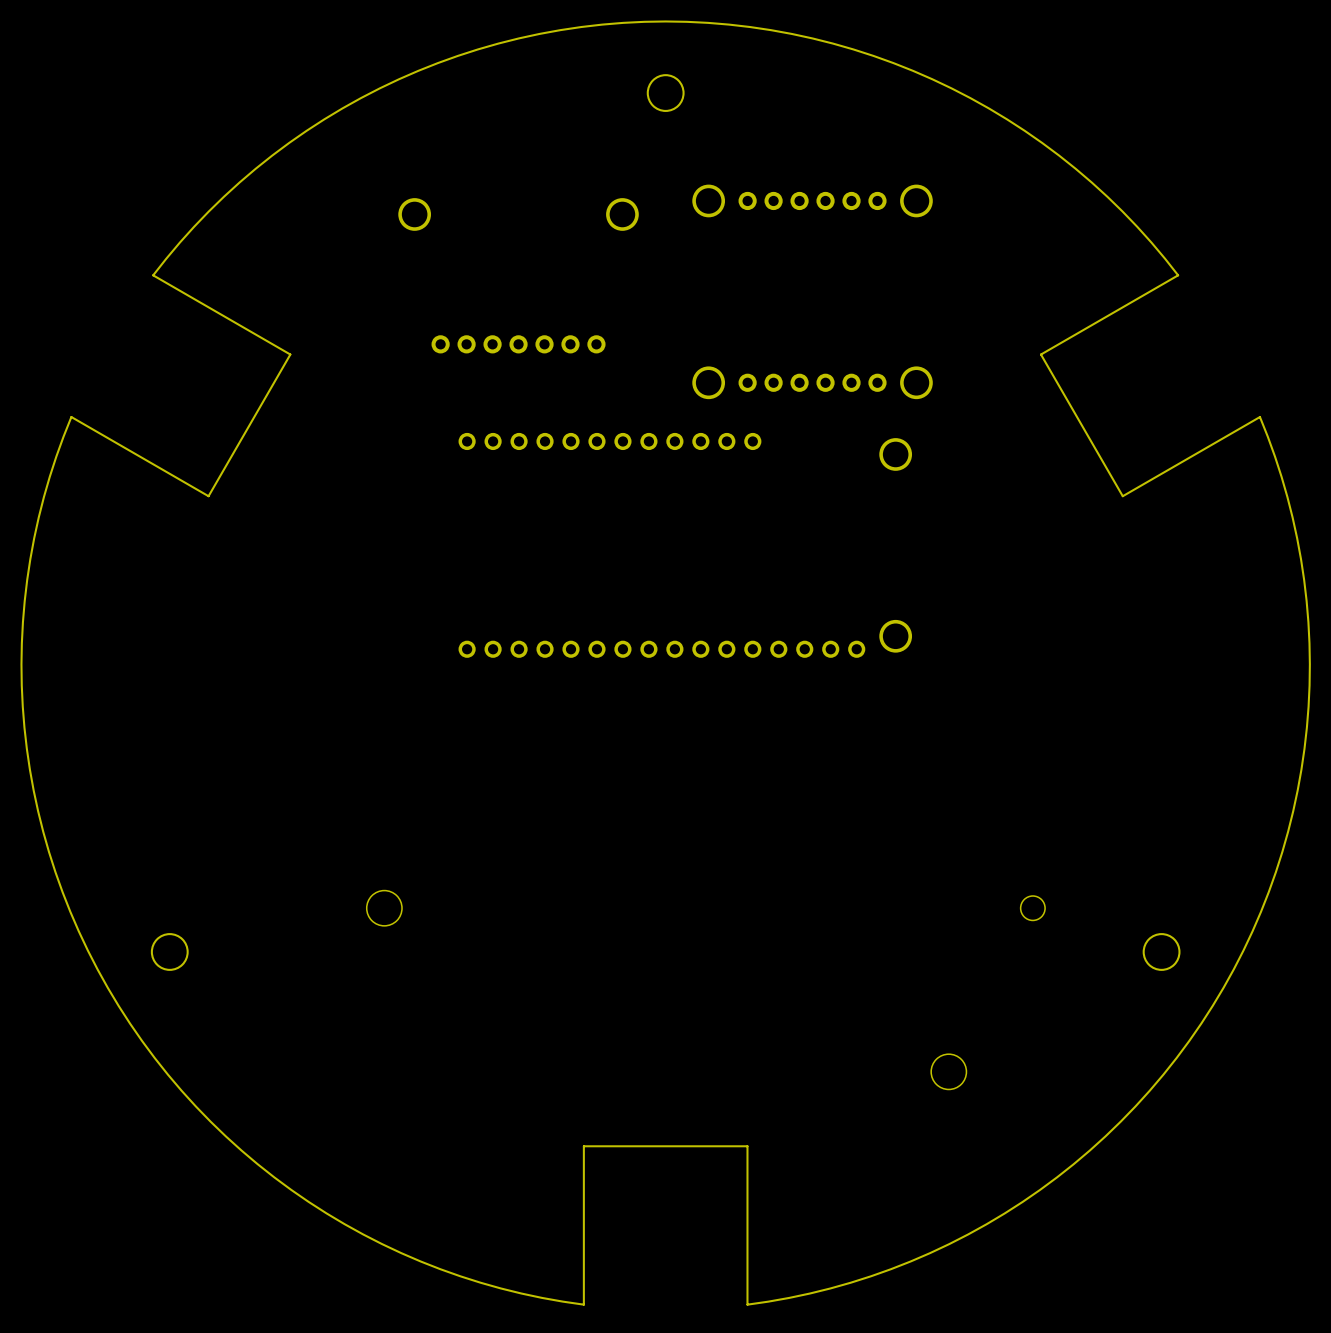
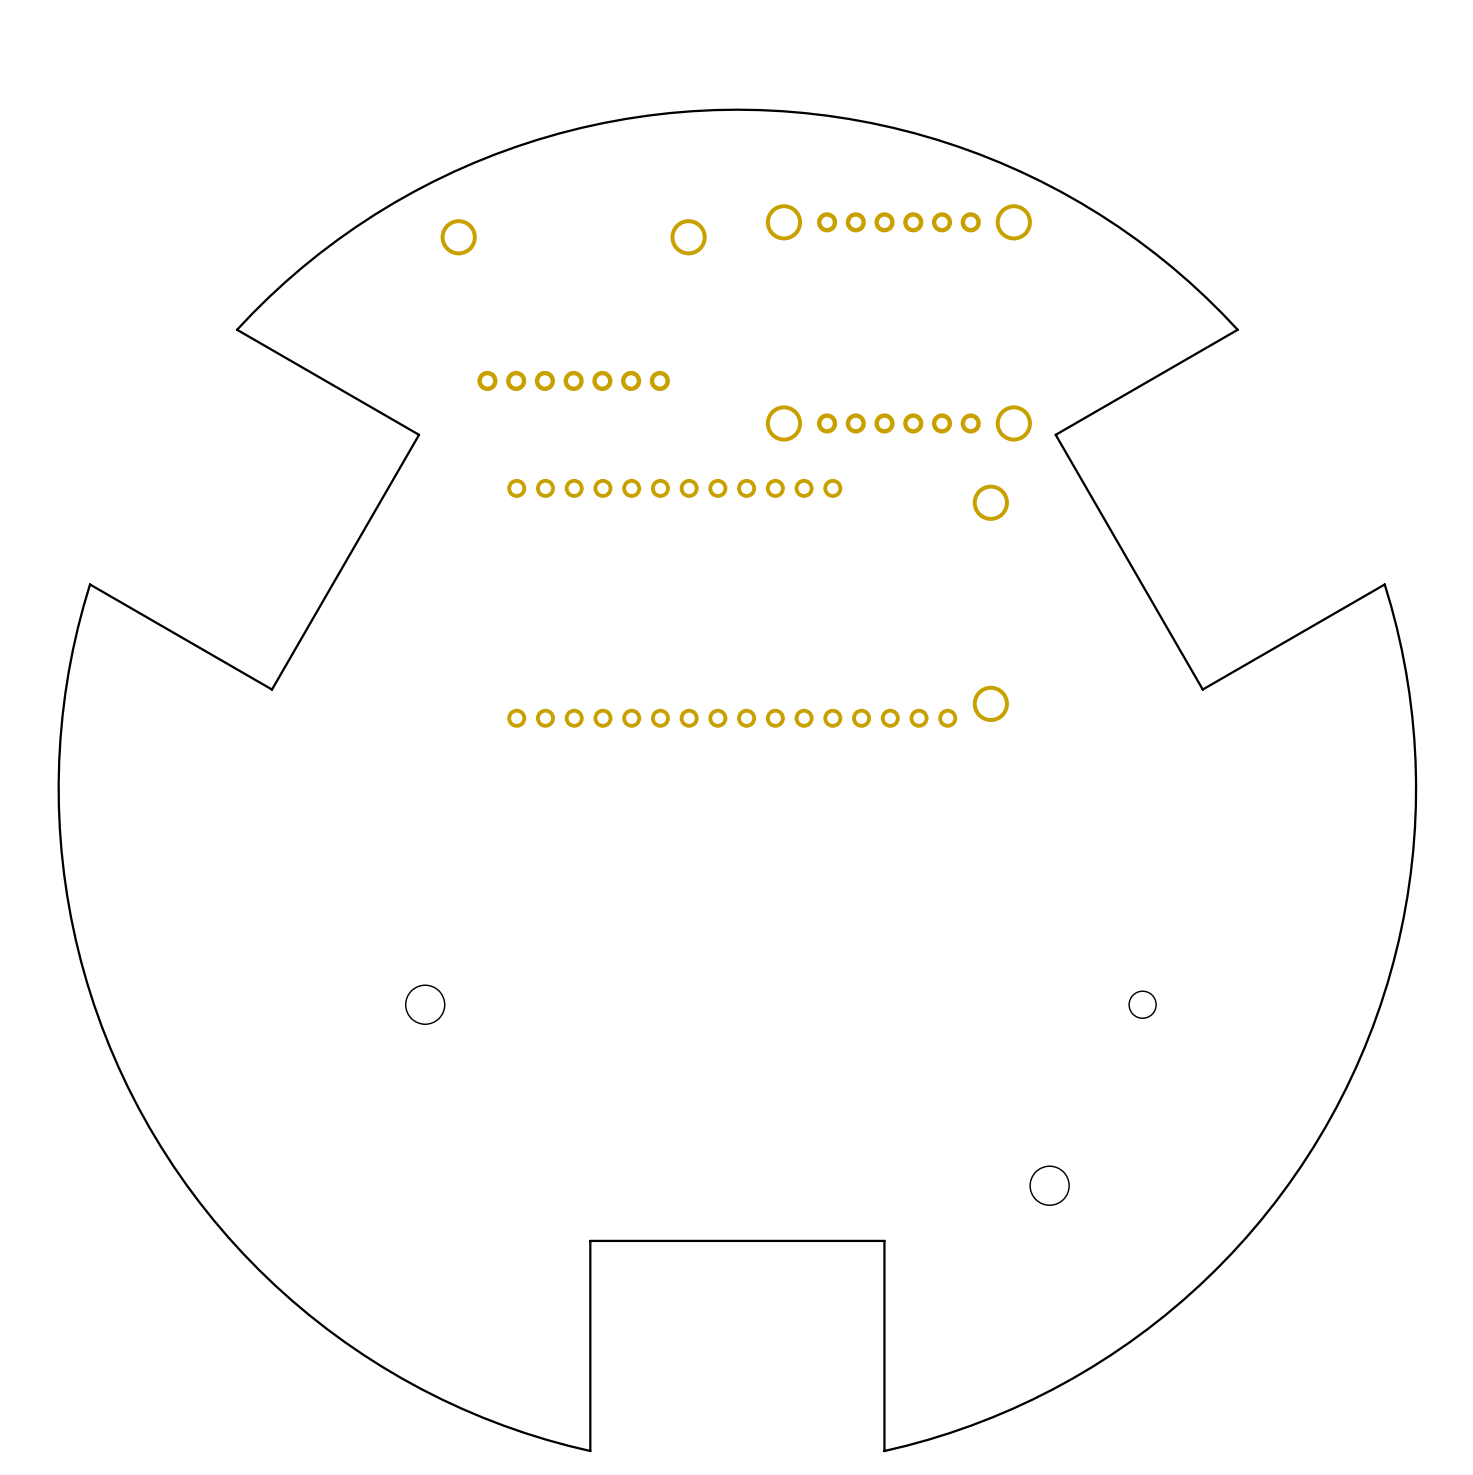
round board edge: [646, 74, 685, 112] -> none
board edge: (1178, 275) (1040, 354) (1122, 496) (1259, 417) (1287, 497) (1304, 579) (1309, 664) (1304, 748) (1293, 811) (1275, 872) (1252, 931) (1223, 987) (1189, 1041) (1149, 1090) (1105, 1136) (1057, 1177) (986, 1224) (910, 1261) (830, 1288) (747, 1304) (747, 1146) (583, 1146) (583, 1304) (521, 1293) (460, 1276) (401, 1253) (344, 1224) (291, 1189) (241, 1150) (195, 1106) (154, 1058) (118, 1005) (87, 950) (62, 892) (43, 831) (29, 769) (22, 706) (21, 643) (27, 579) (43, 497) (71, 417) (208, 496) (290, 354) (153, 275) (208, 211) (272, 155) (324, 119) (379, 88) (437, 63) (498, 43) (560, 30) (623, 22) (686, 21) (750, 27) (812, 38) (873, 55) (932, 79) (988, 108) (1042, 142) (1091, 182) (1137, 226) (1178, 275) -> (1237, 329) (1189, 282) (1137, 239) (1080, 202) (1020, 171) (958, 146) (893, 127) (827, 115) (759, 110) (692, 111) (625, 119) (559, 133) (495, 154) (433, 181) (374, 214) (319, 253) (268, 297) (237, 329) (419, 434) (271, 689) (90, 584) (68, 671) (59, 761) (59, 828) (67, 895) (81, 961) (101, 1026) (128, 1088) (161, 1147) (199, 1202) (243, 1253) (309, 1315) (363, 1355) (402, 1378) (483, 1417) (546, 1439) (590, 1451) (590, 1240) (884, 1240) (884, 1451) (970, 1425) (1052, 1389) (1129, 1342) (1199, 1285) (1246, 1237) (1288, 1184) (1325, 1127) (1355, 1067) (1380, 1004) (1398, 940) (1410, 873) (1415, 806) (1414, 738) (1409, 694) (1396, 627) (1384, 584) (1202, 689) (1055, 434) (1237, 329)
round board edge: [150, 933, 189, 971] -> none
round board edge: [1142, 933, 1181, 971] -> none

